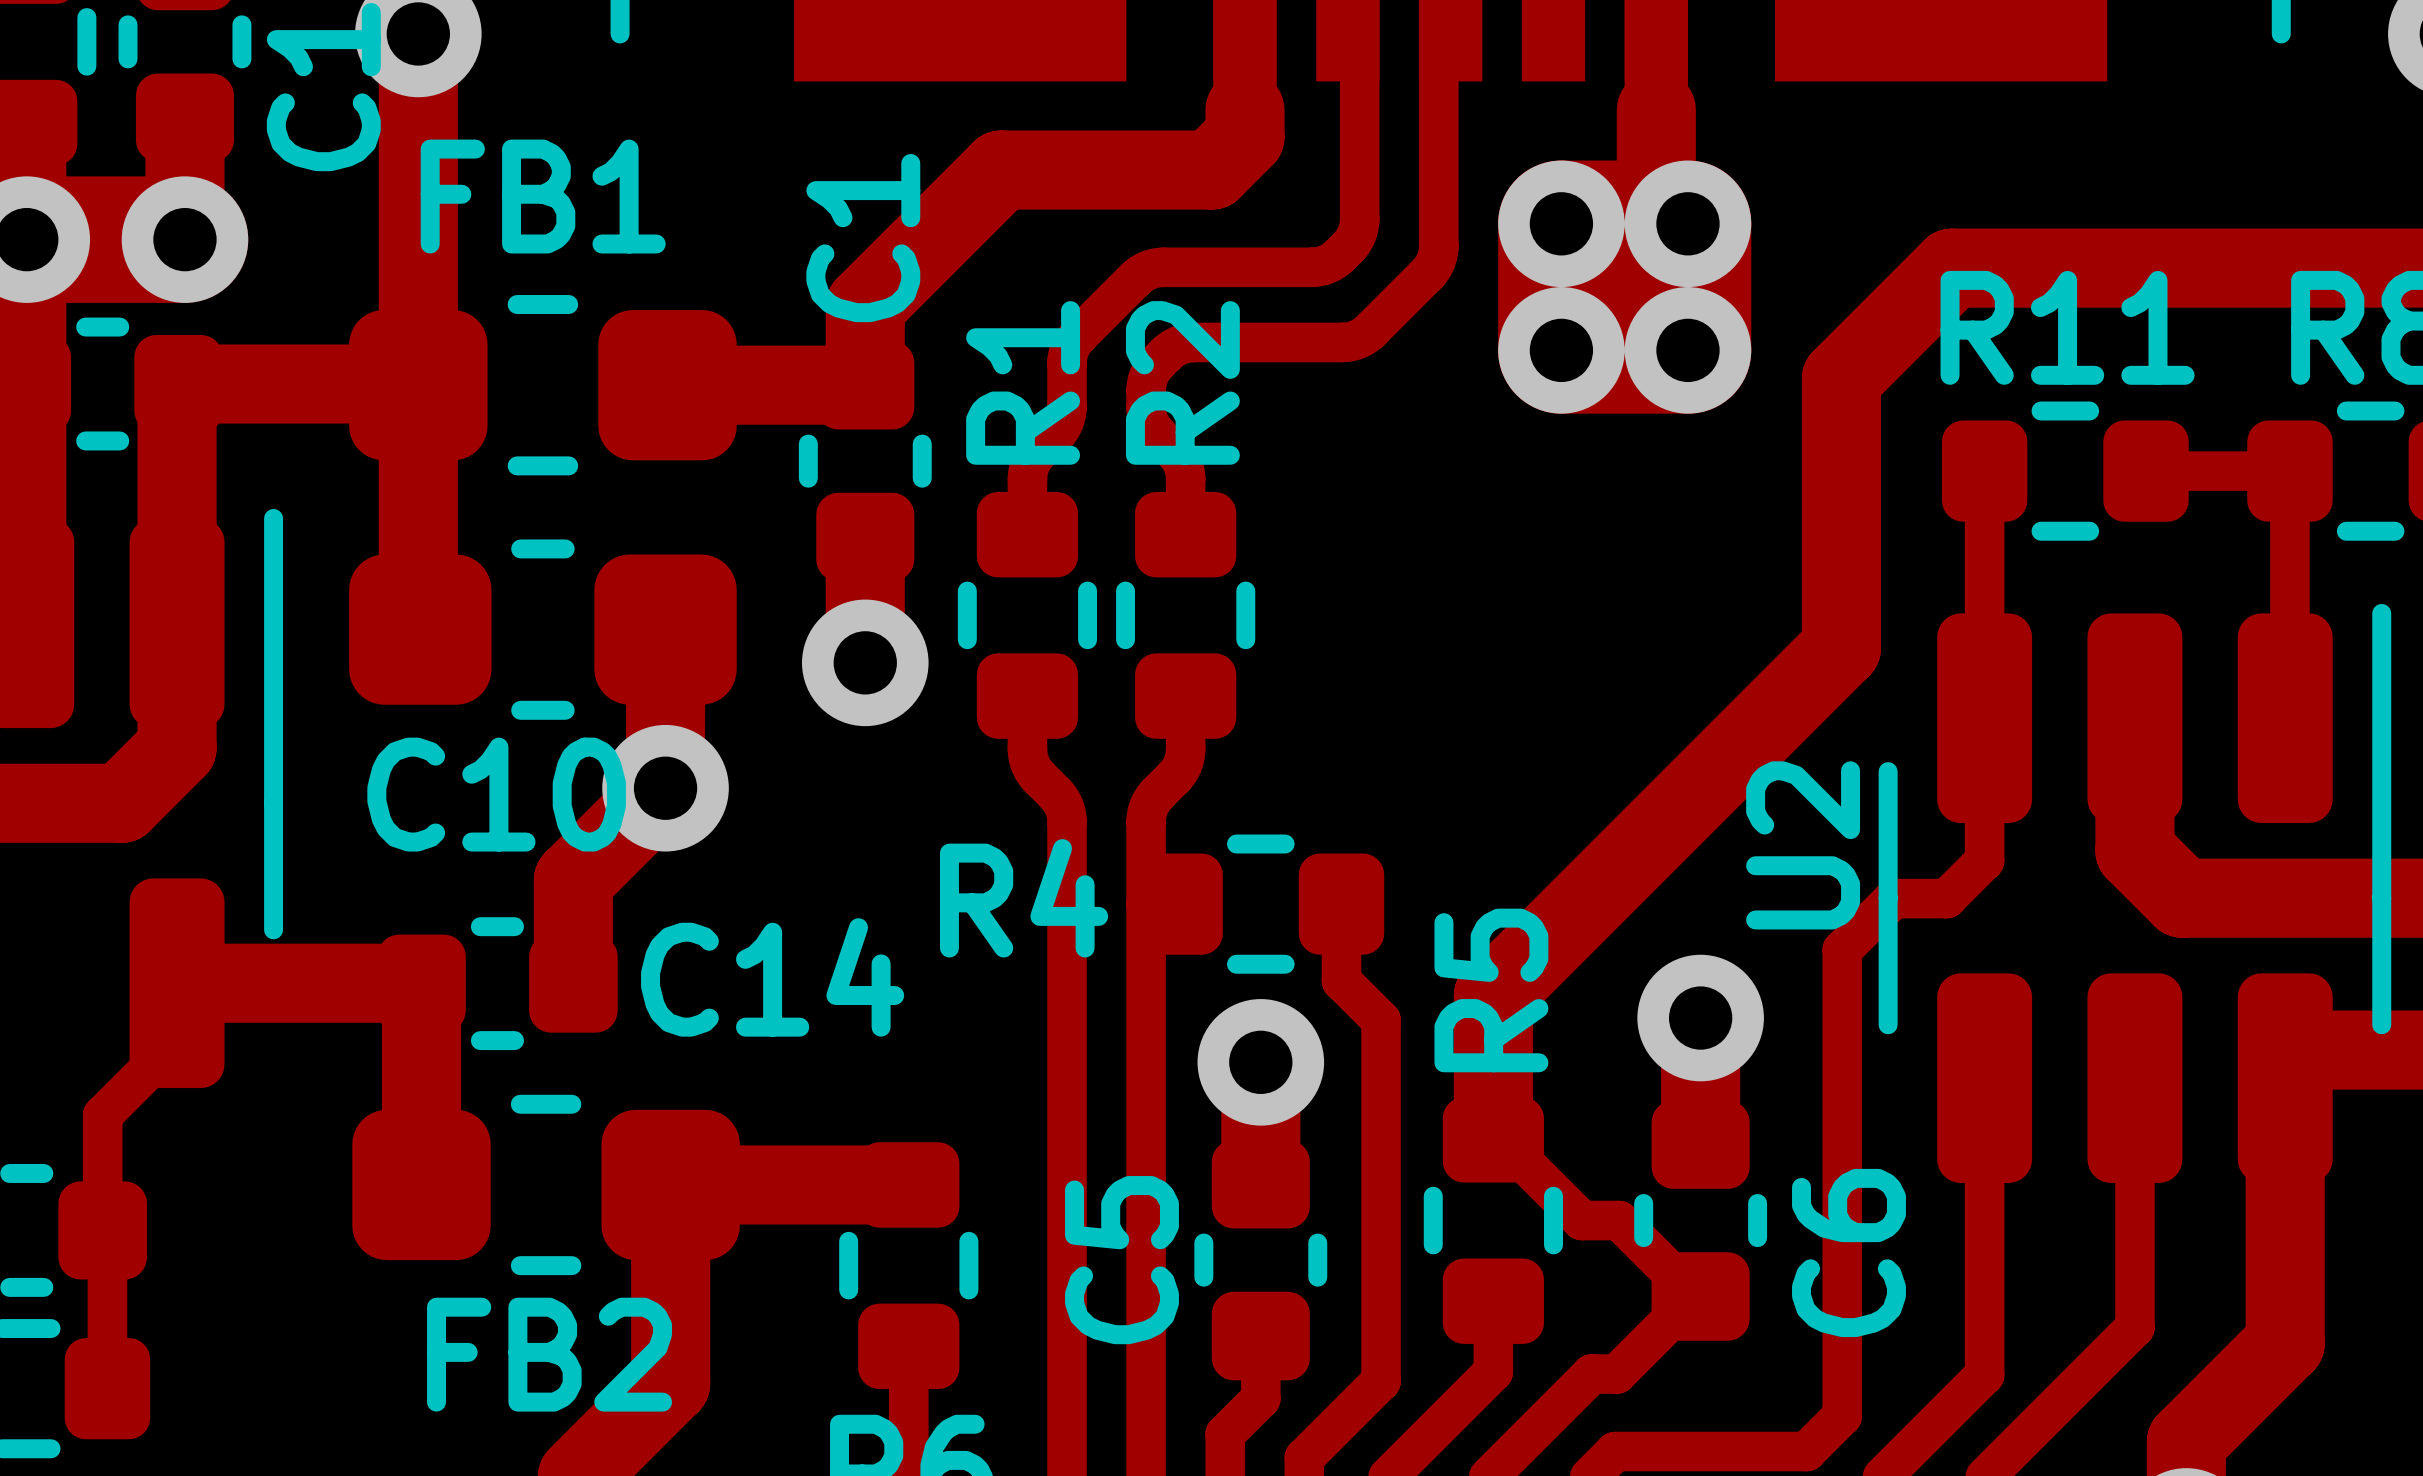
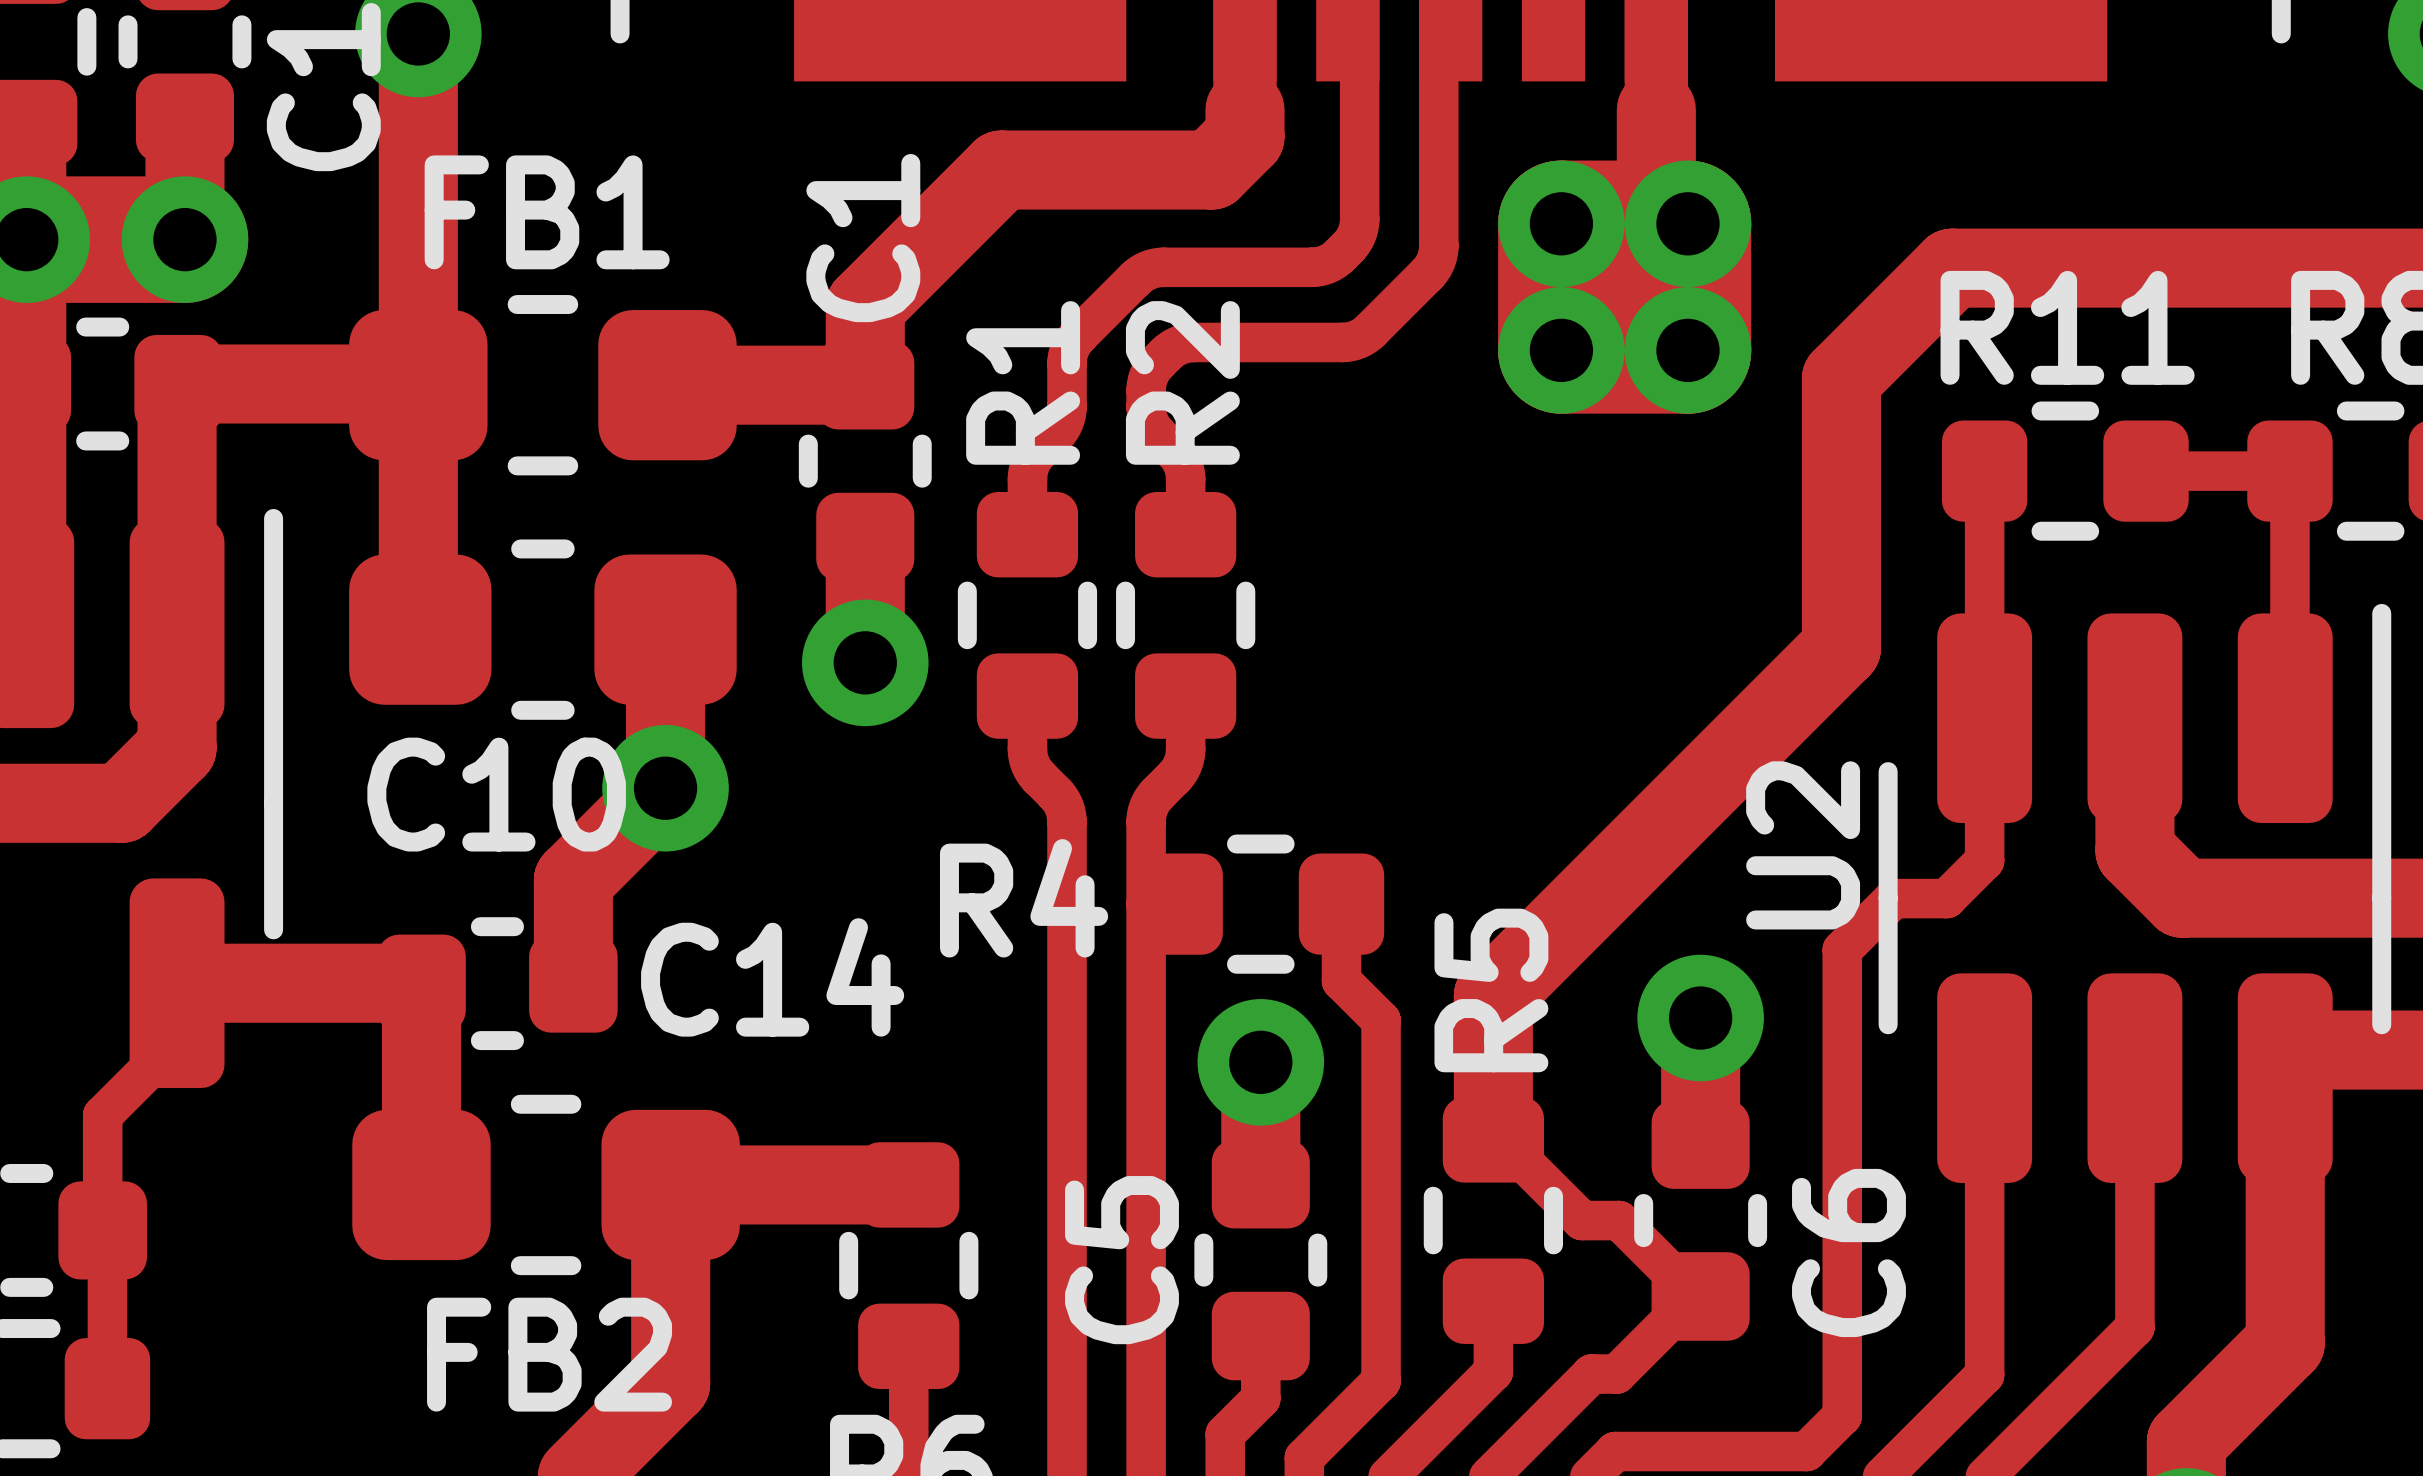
FB1 name position: FB1 (543, 196) -> FB1 (547, 212)

